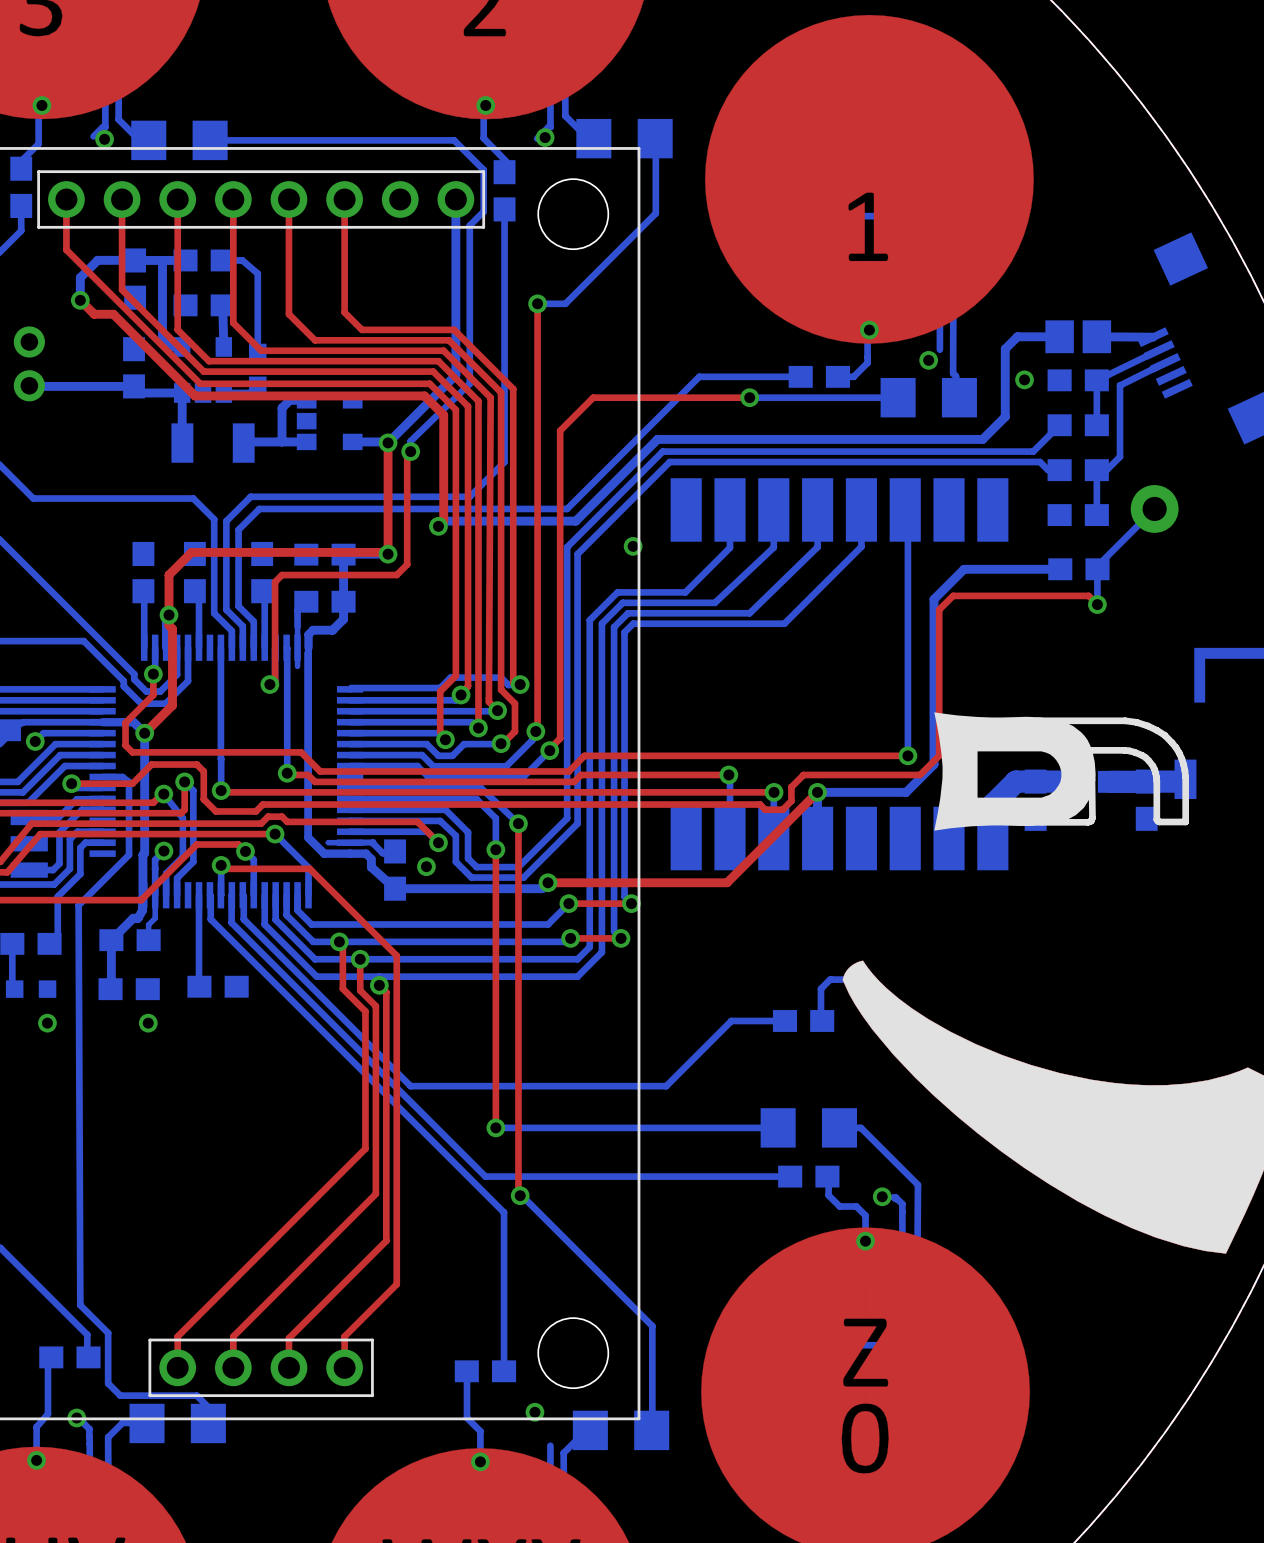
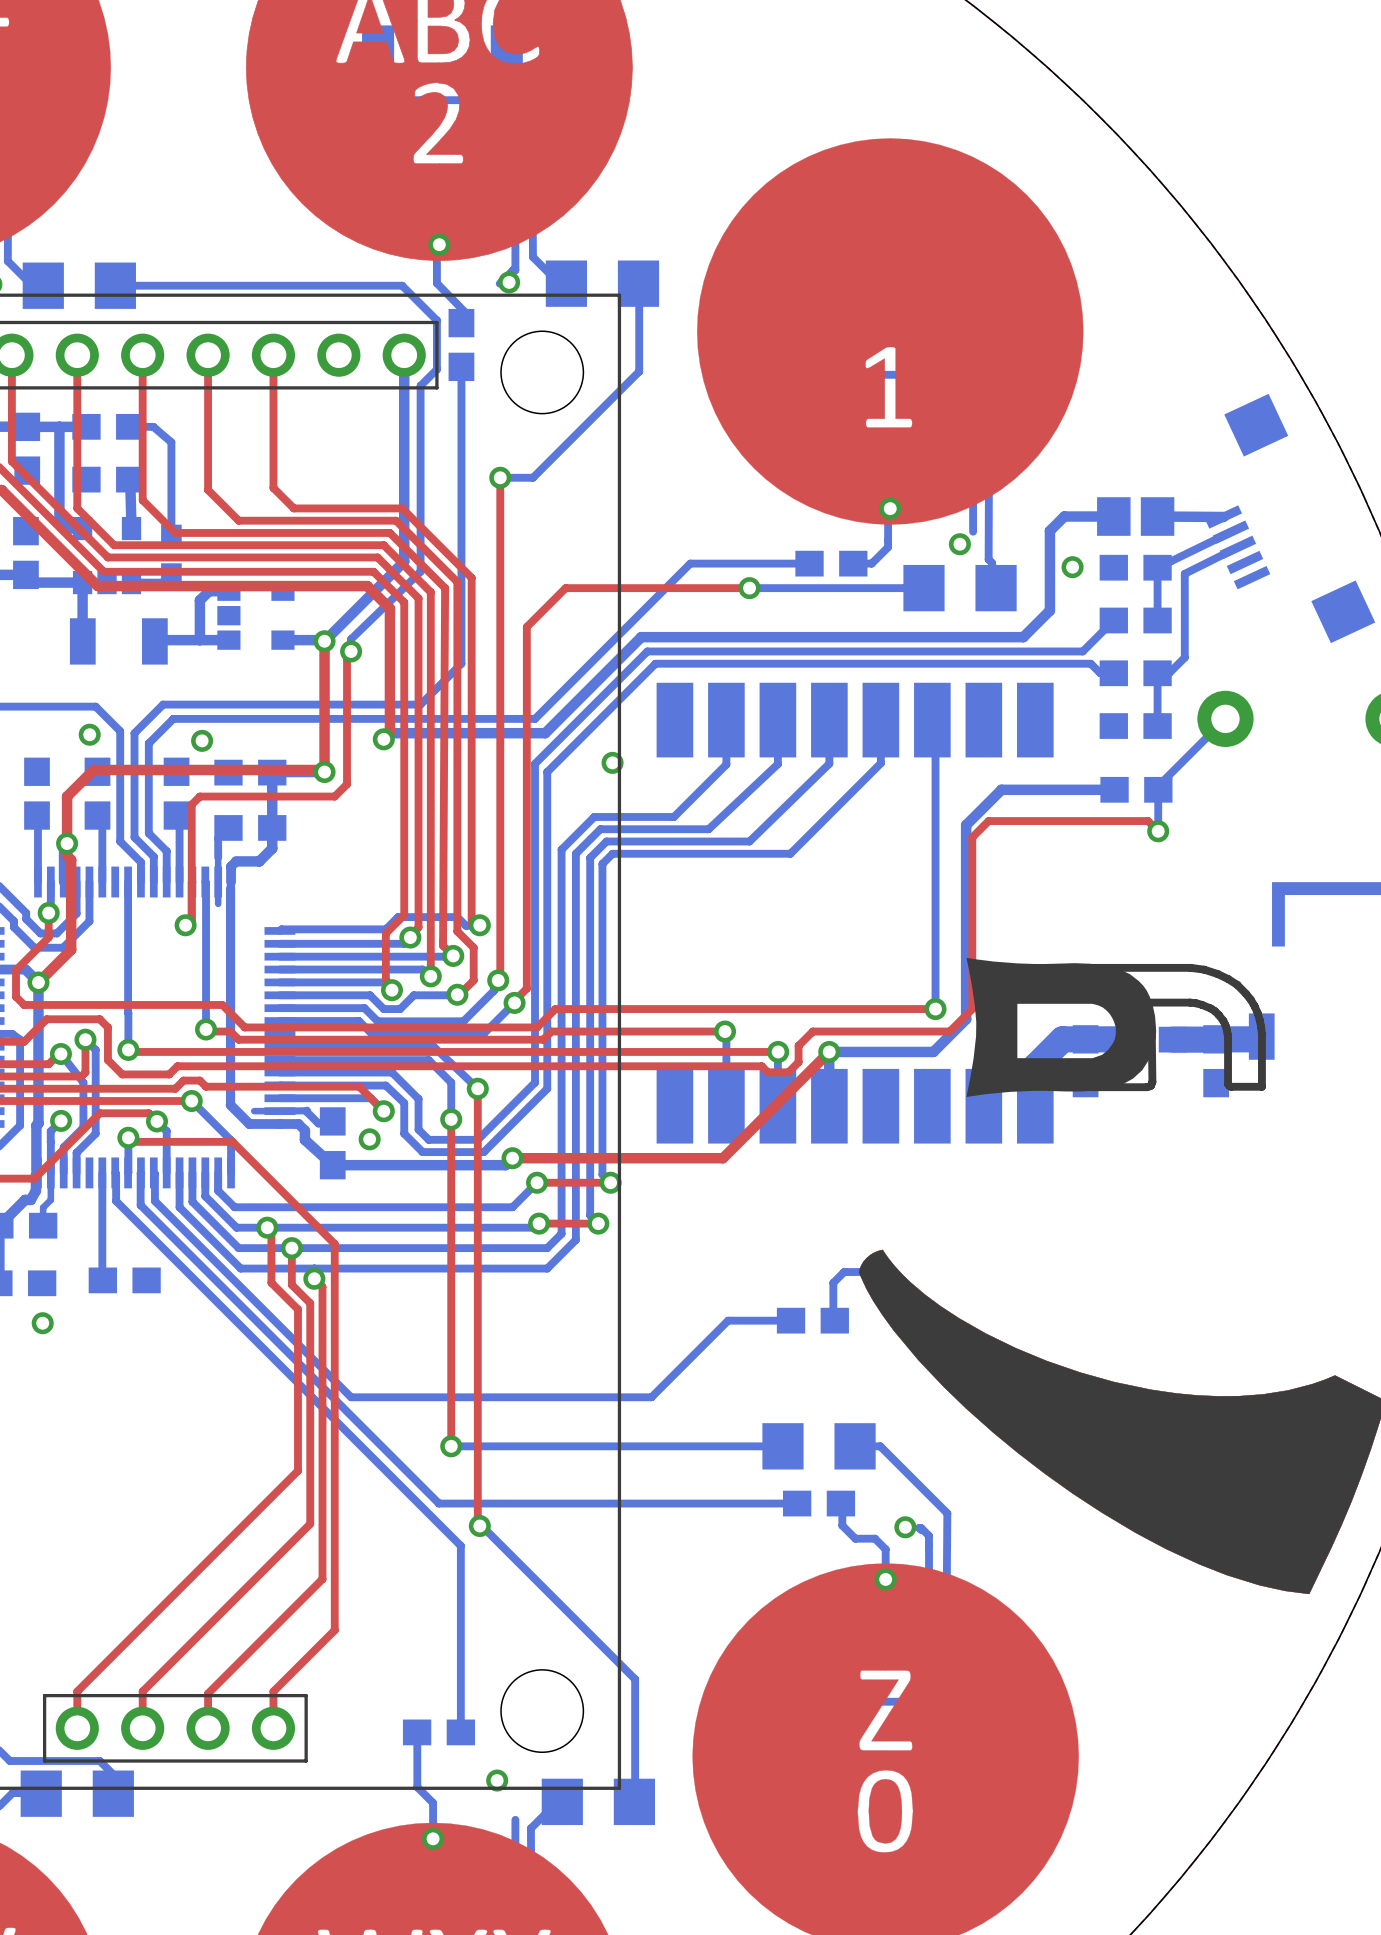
via: none -> (89, 734)
via: none -> (202, 740)

